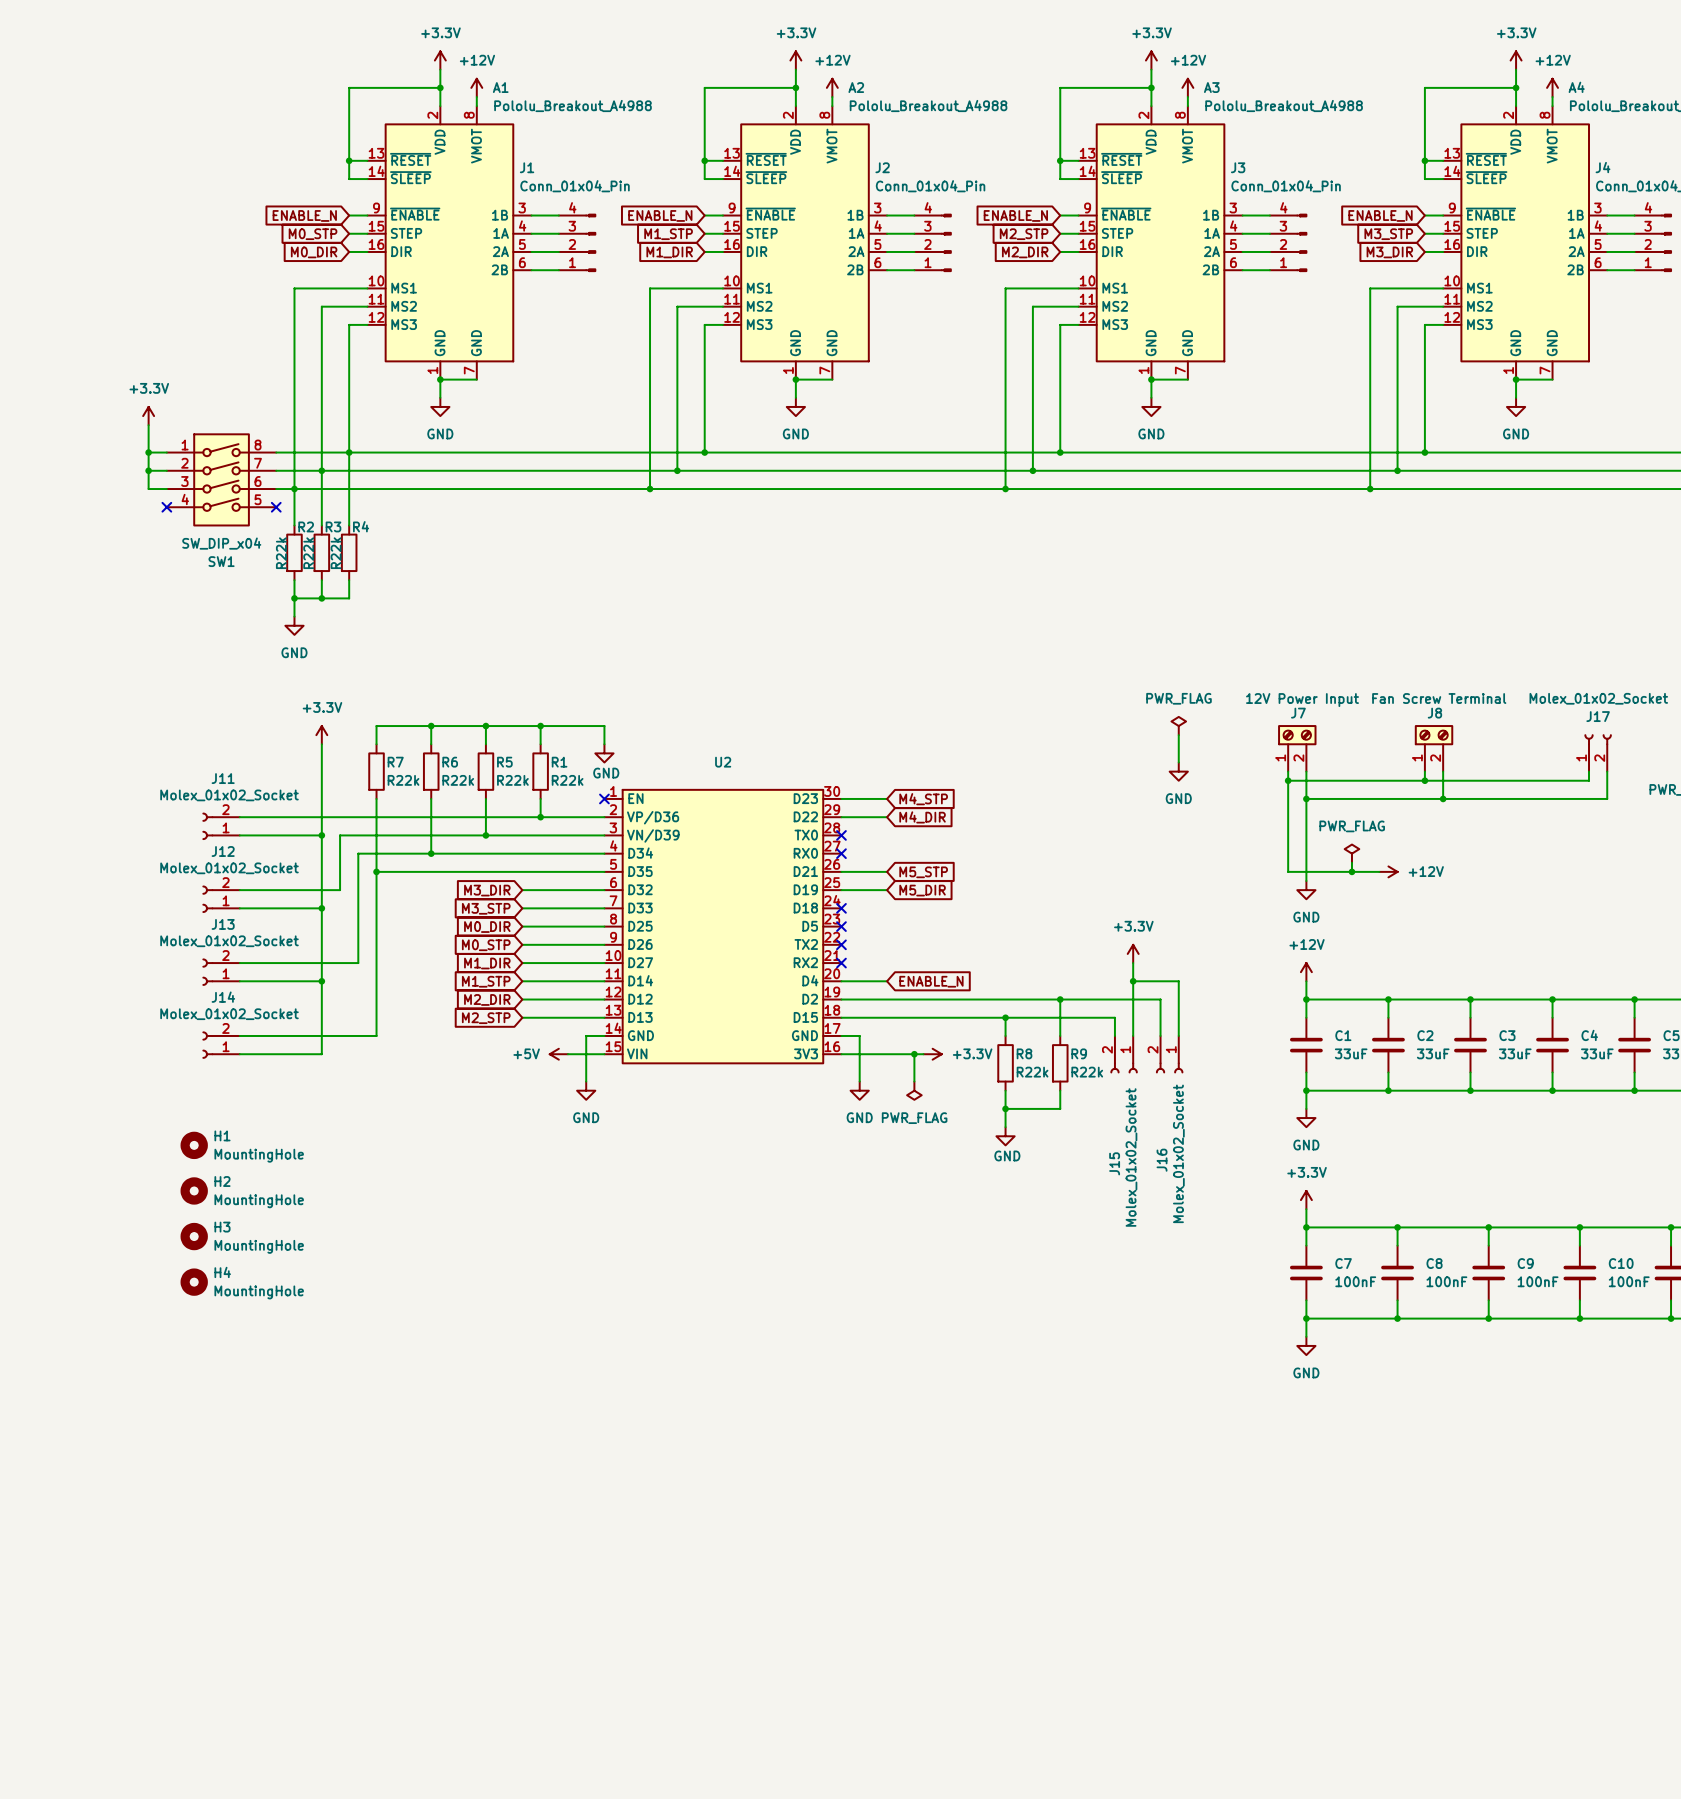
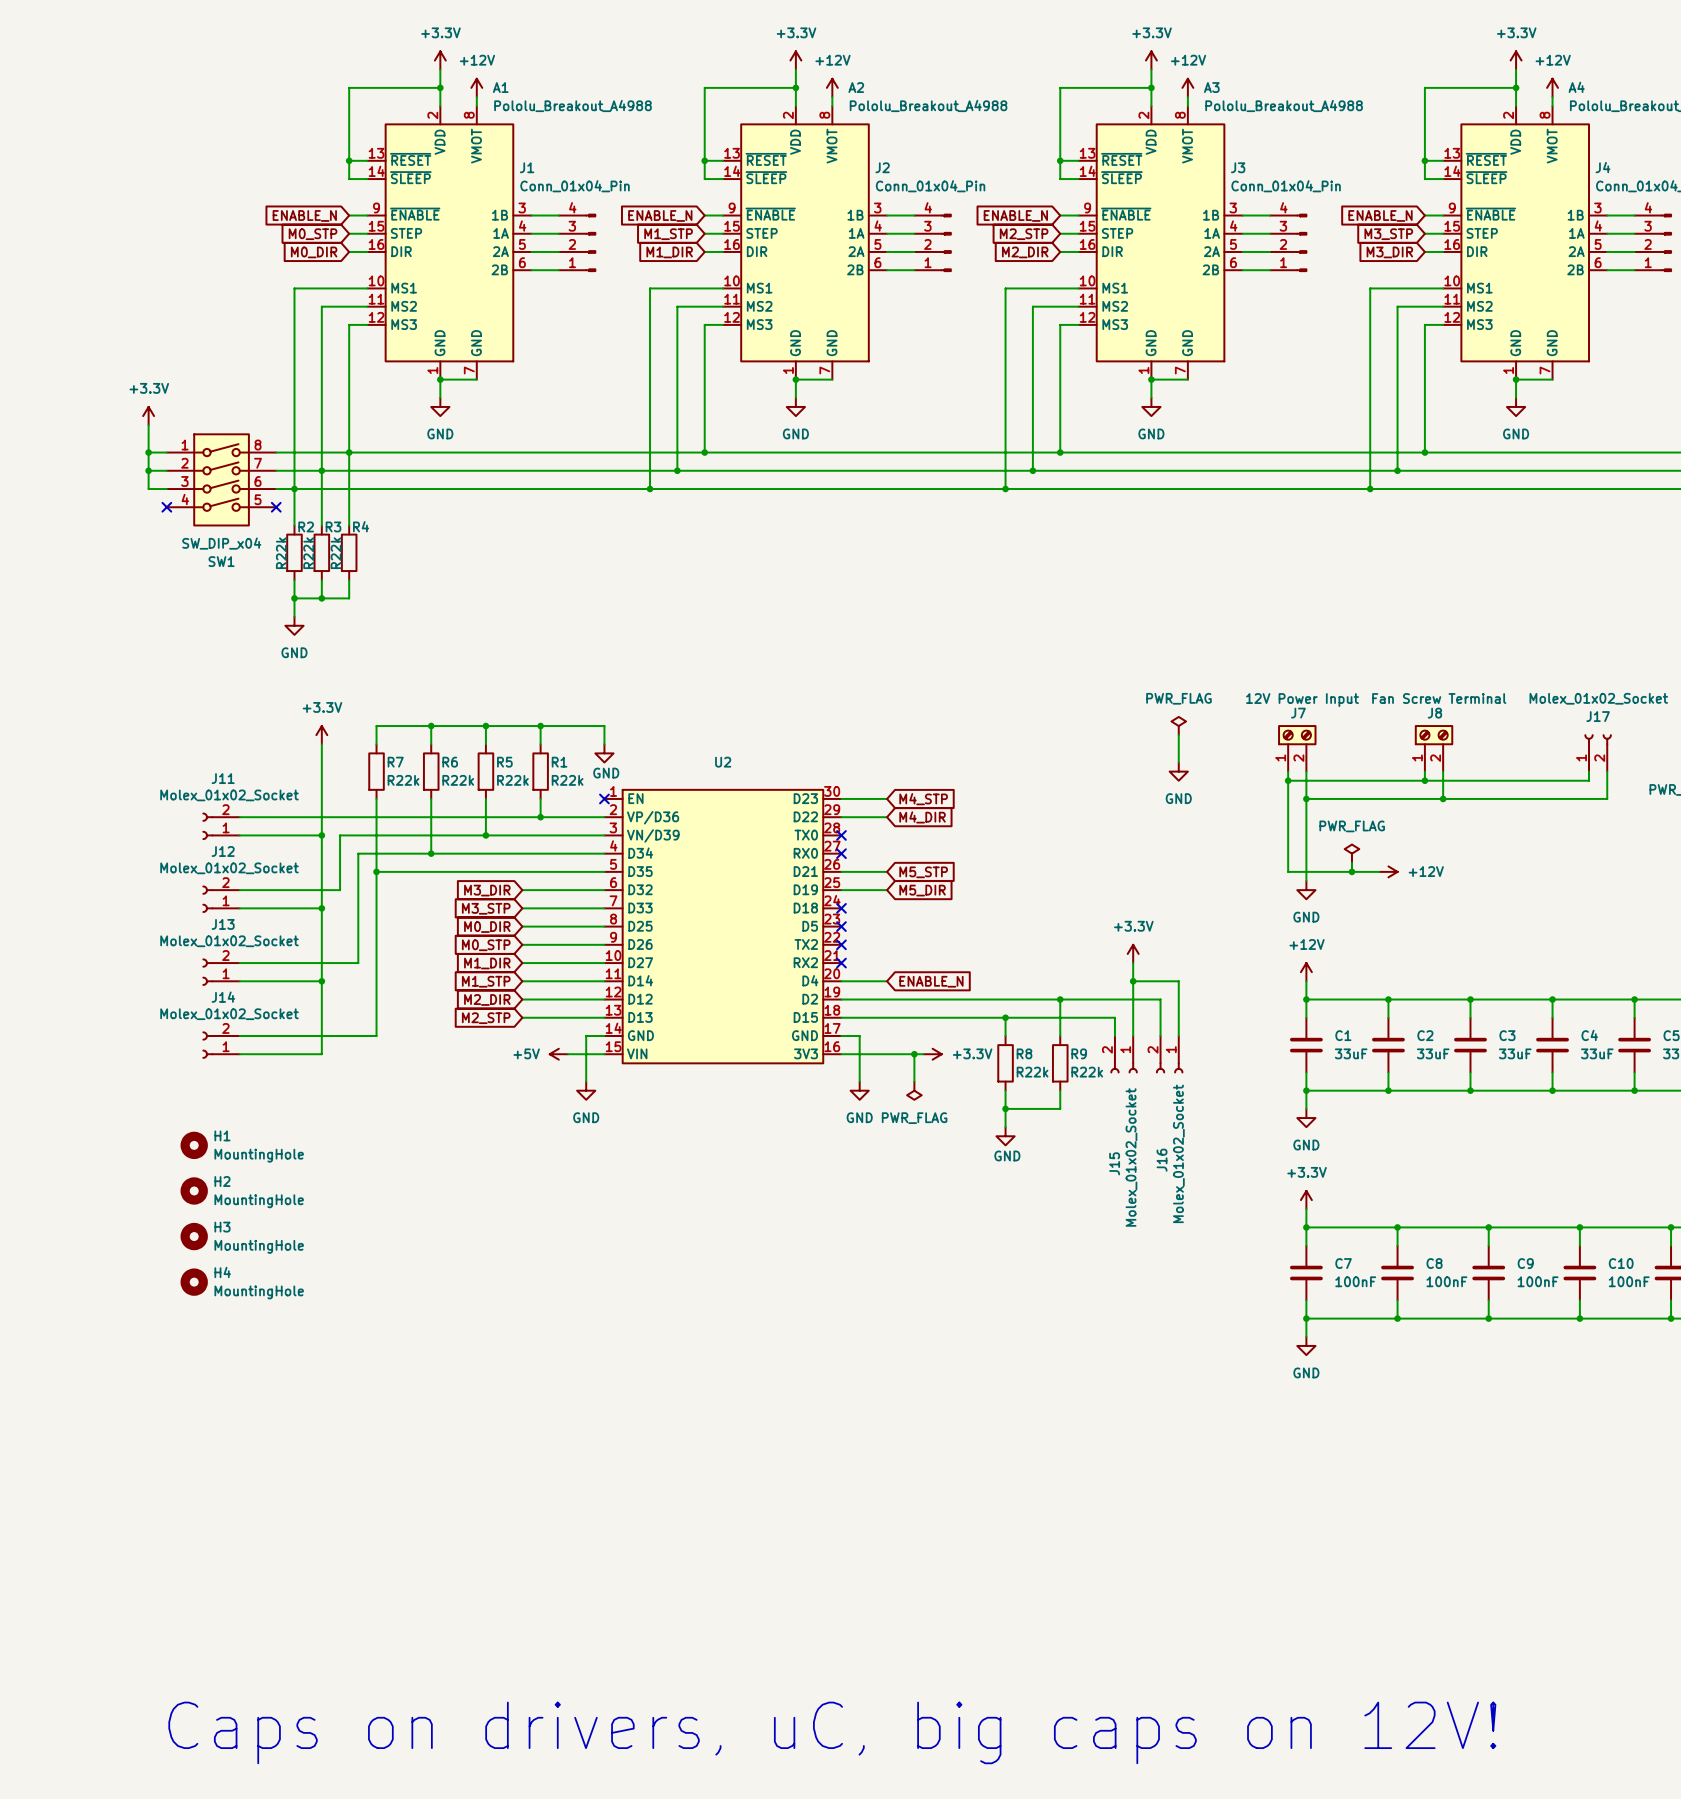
text: none -> Caps on drivers, uC, big caps on 12V! (832, 1732)

